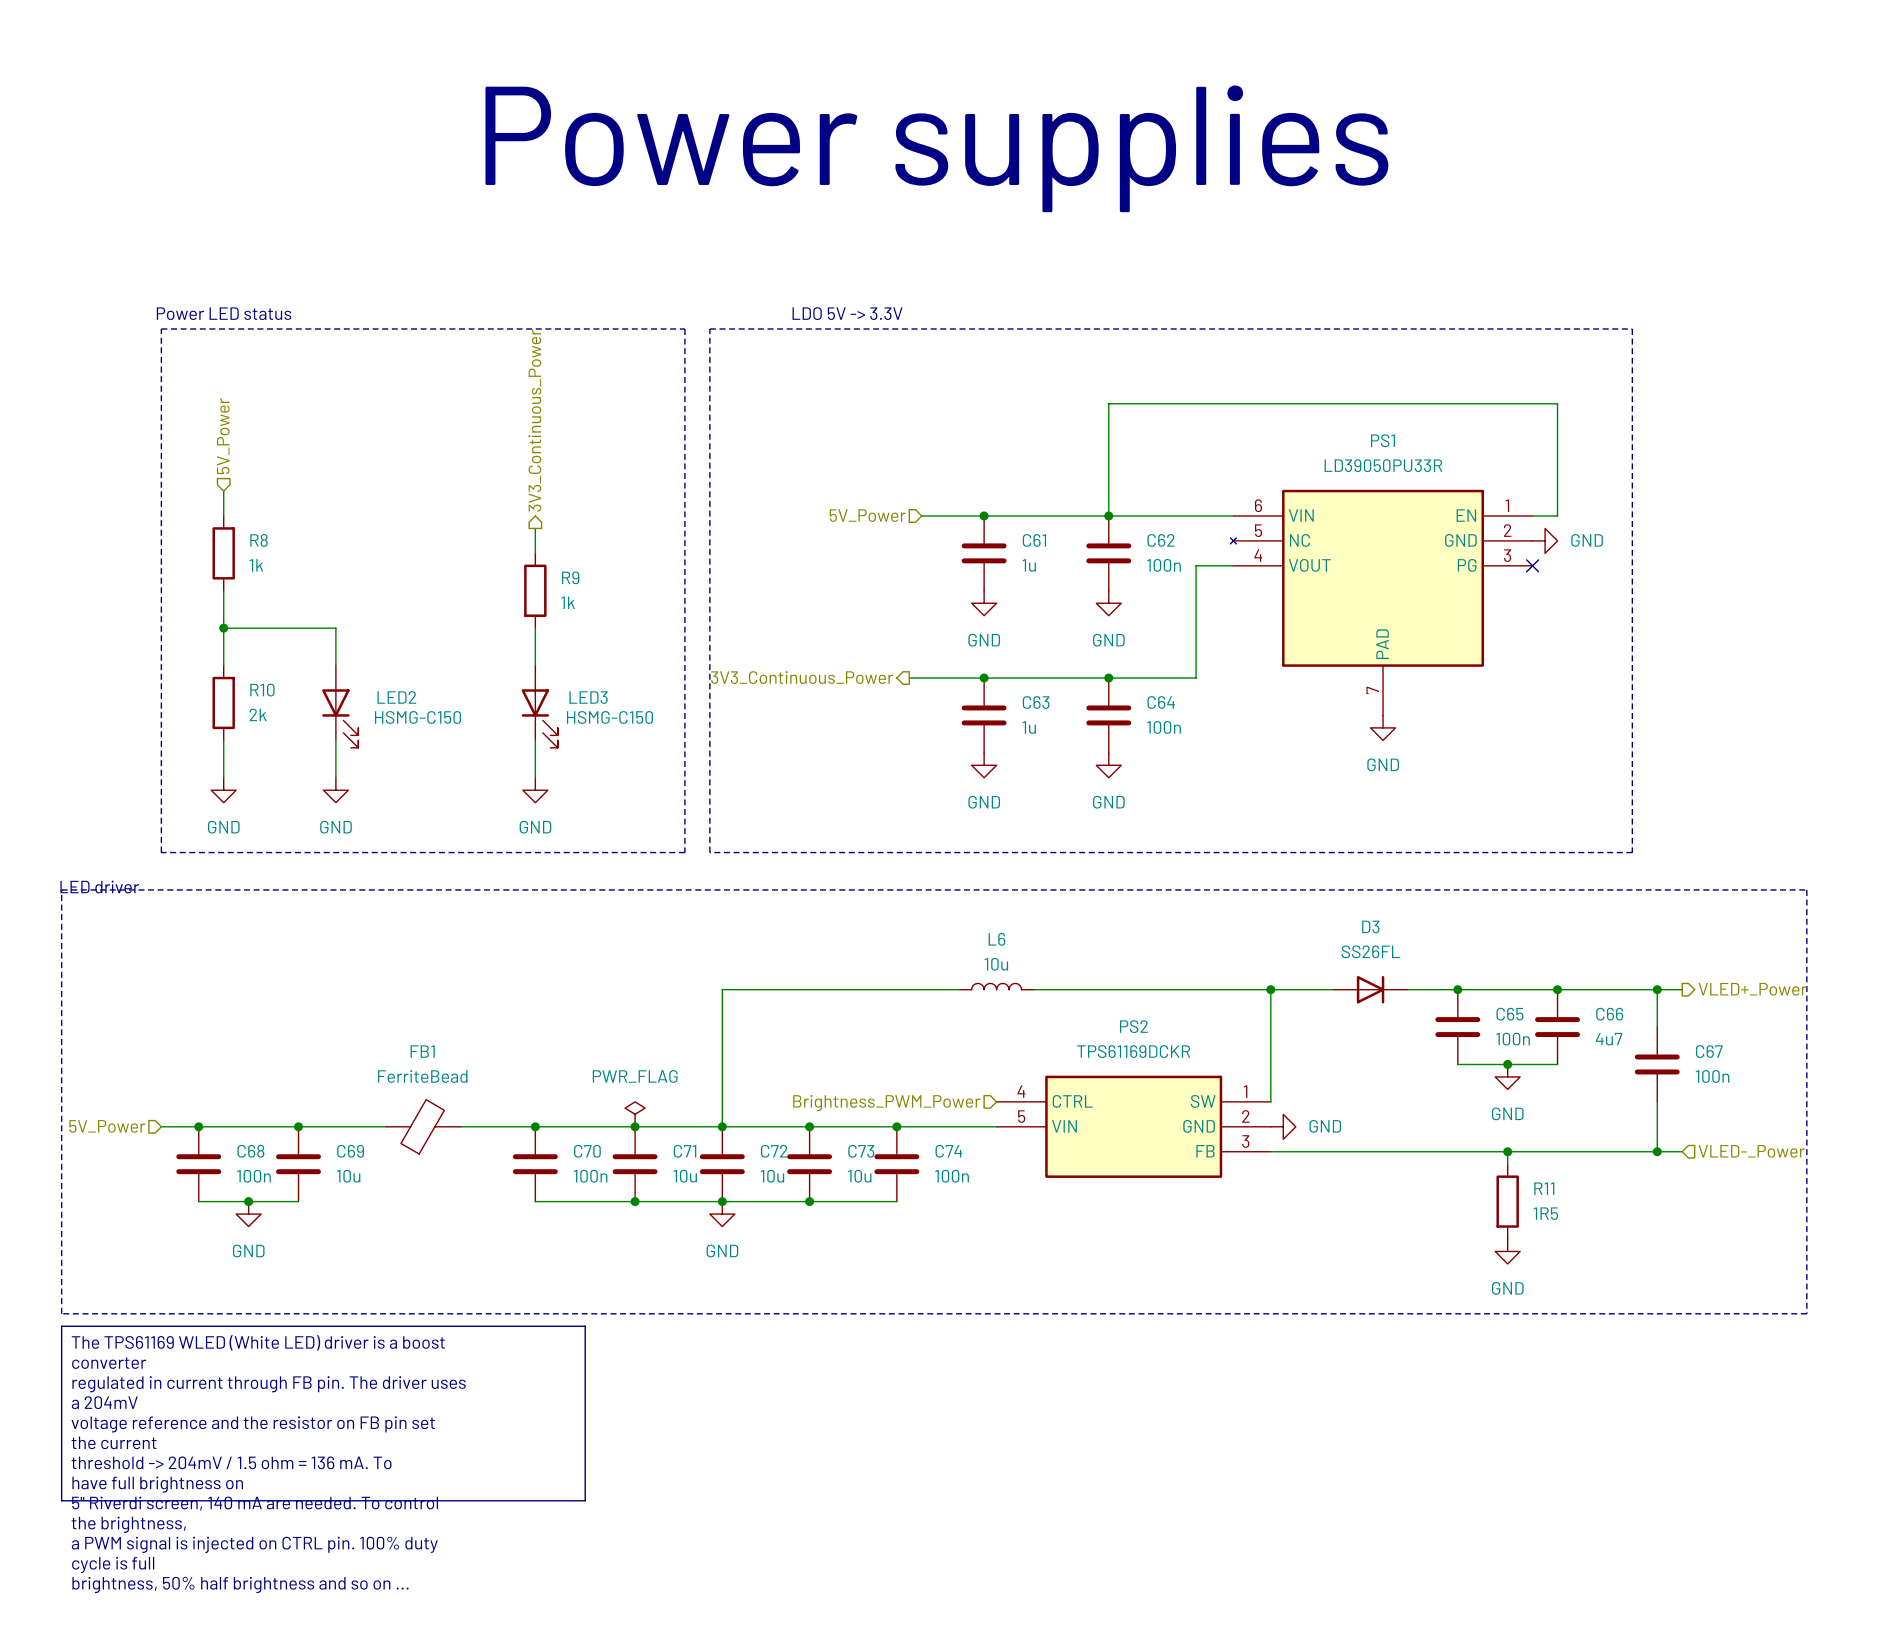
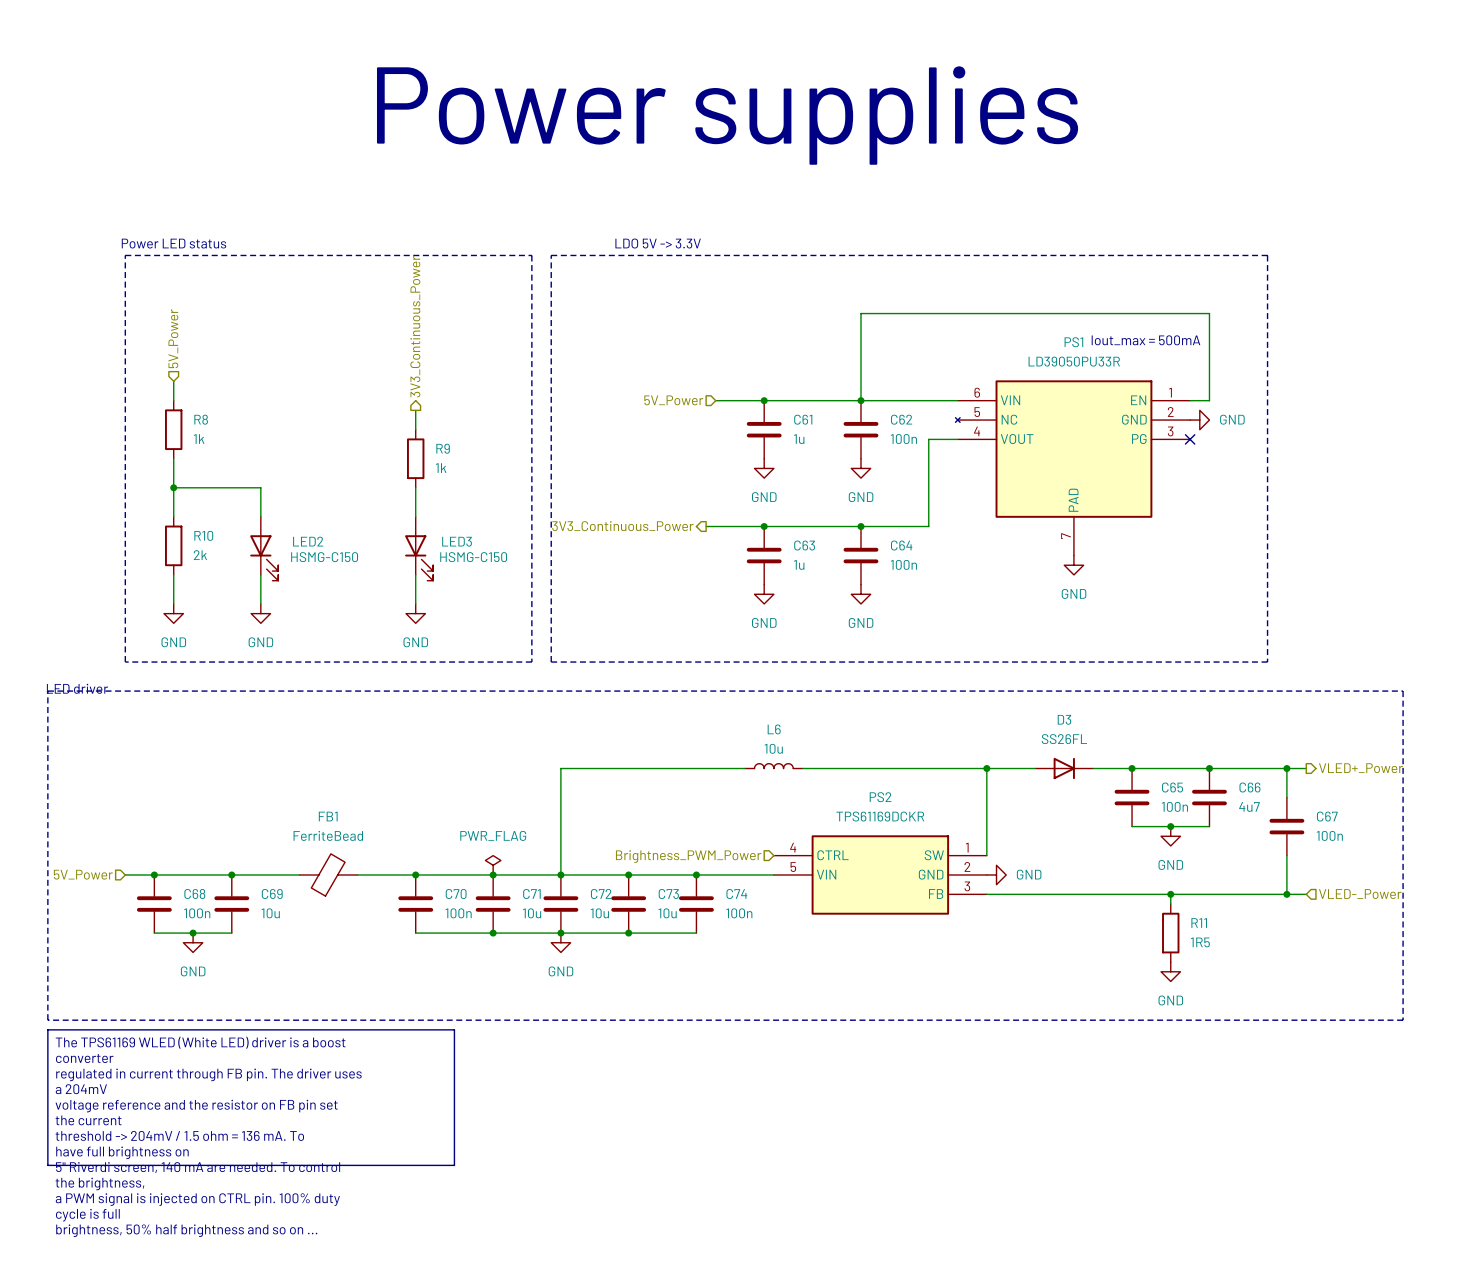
text: none -> Iout_max = 500mA (1145, 340)

